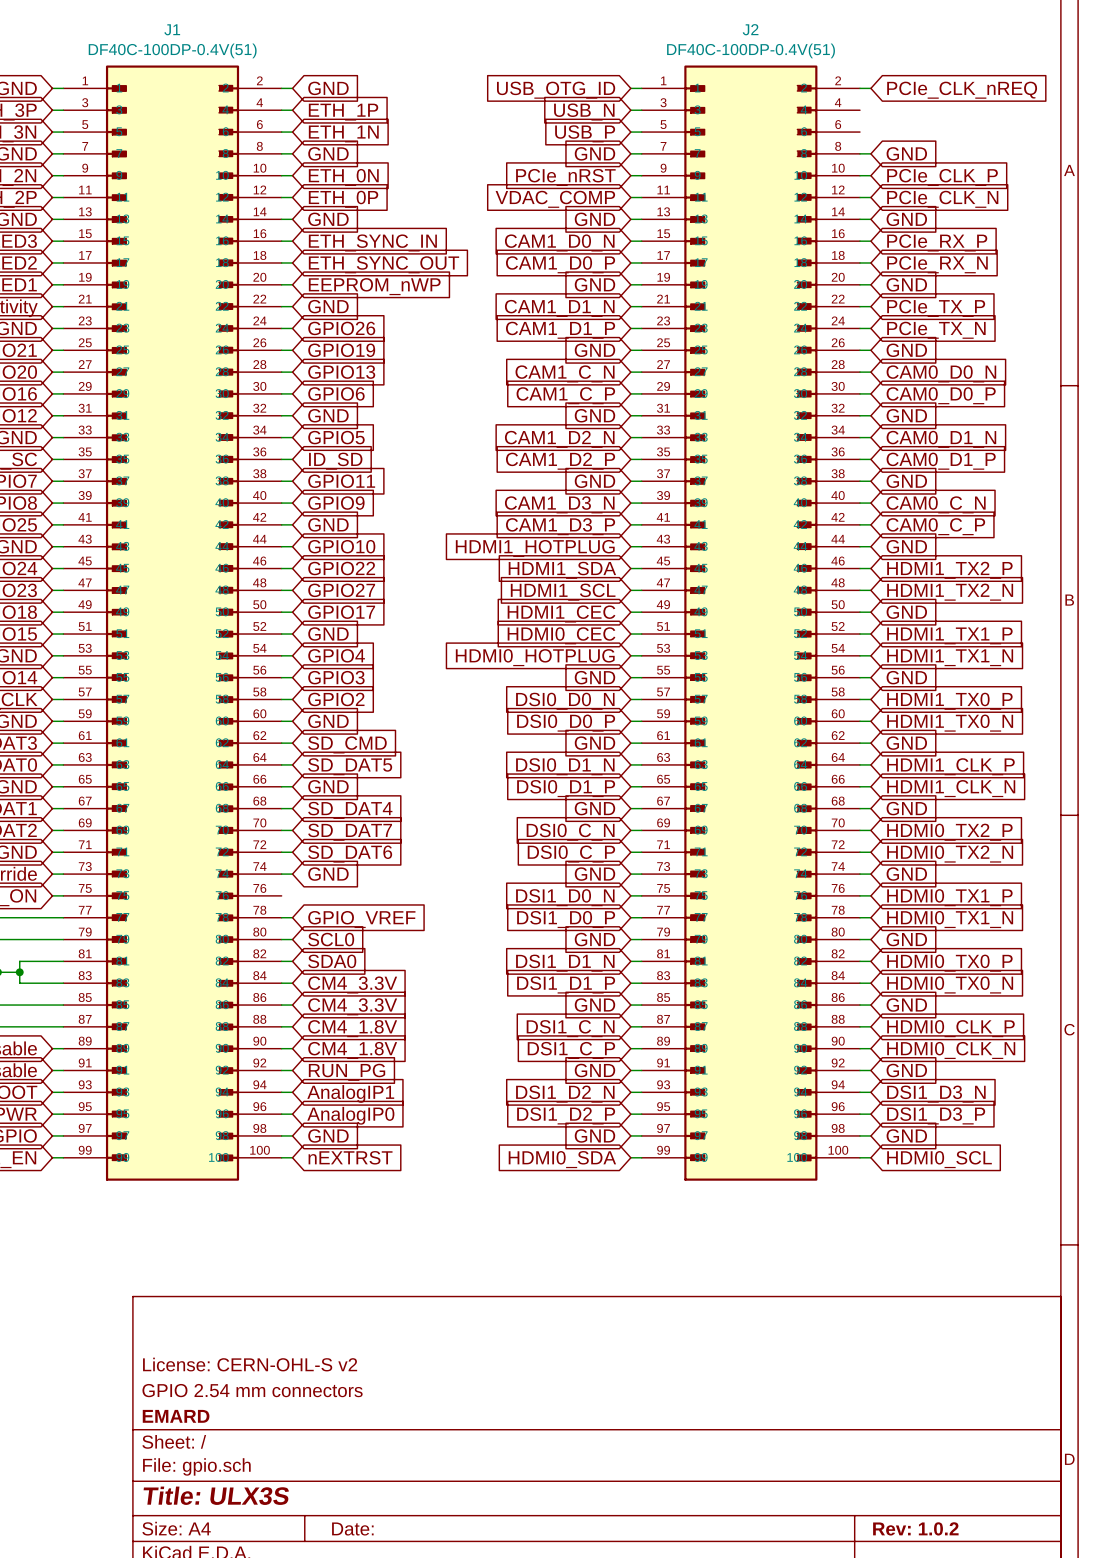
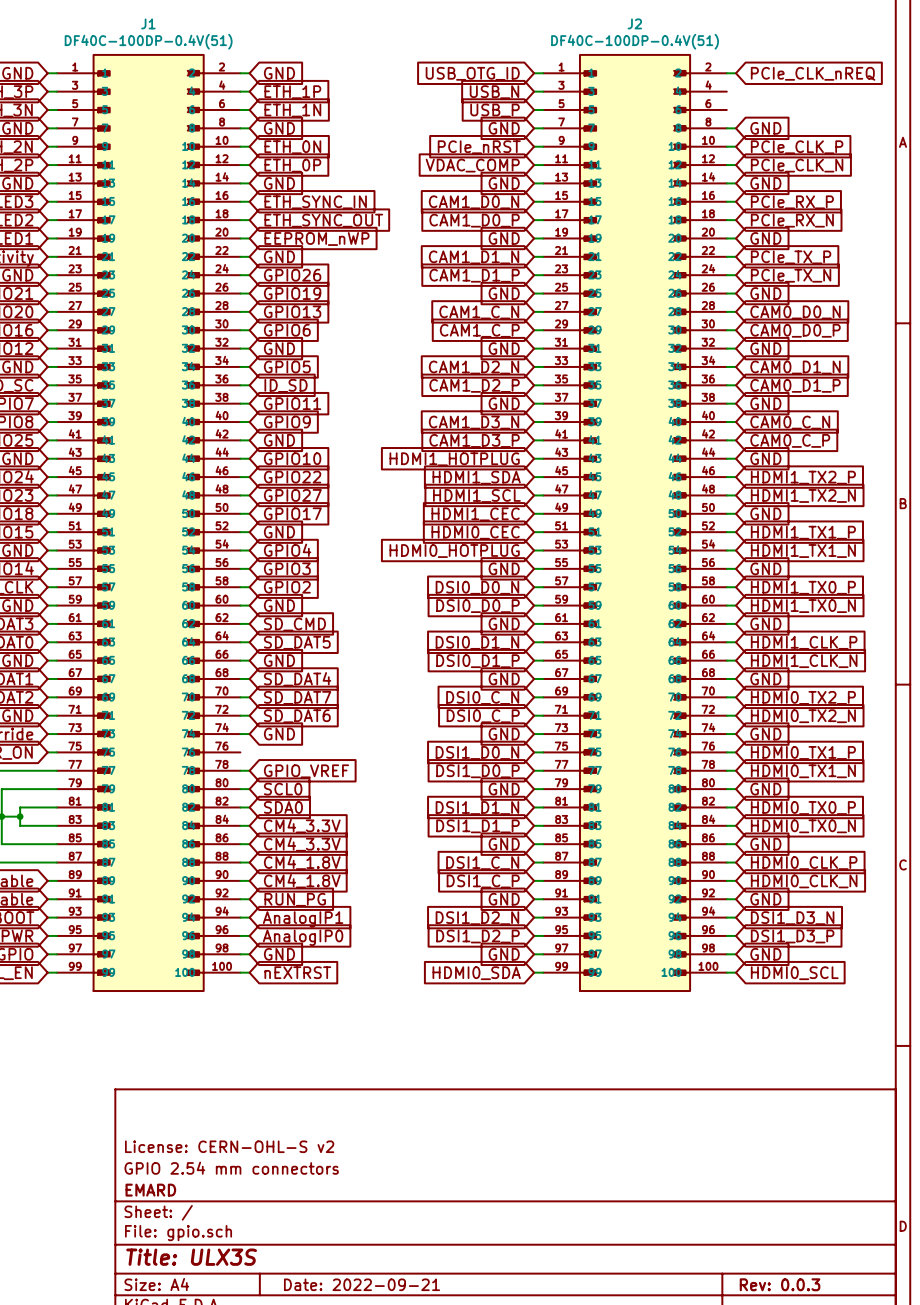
title block: Rev: 1.0.2 (915, 1528) -> Rev: 0.0.3 (780, 1284)
title block: Date: (352, 1529) -> Date: 2022-09-21 (362, 1284)

